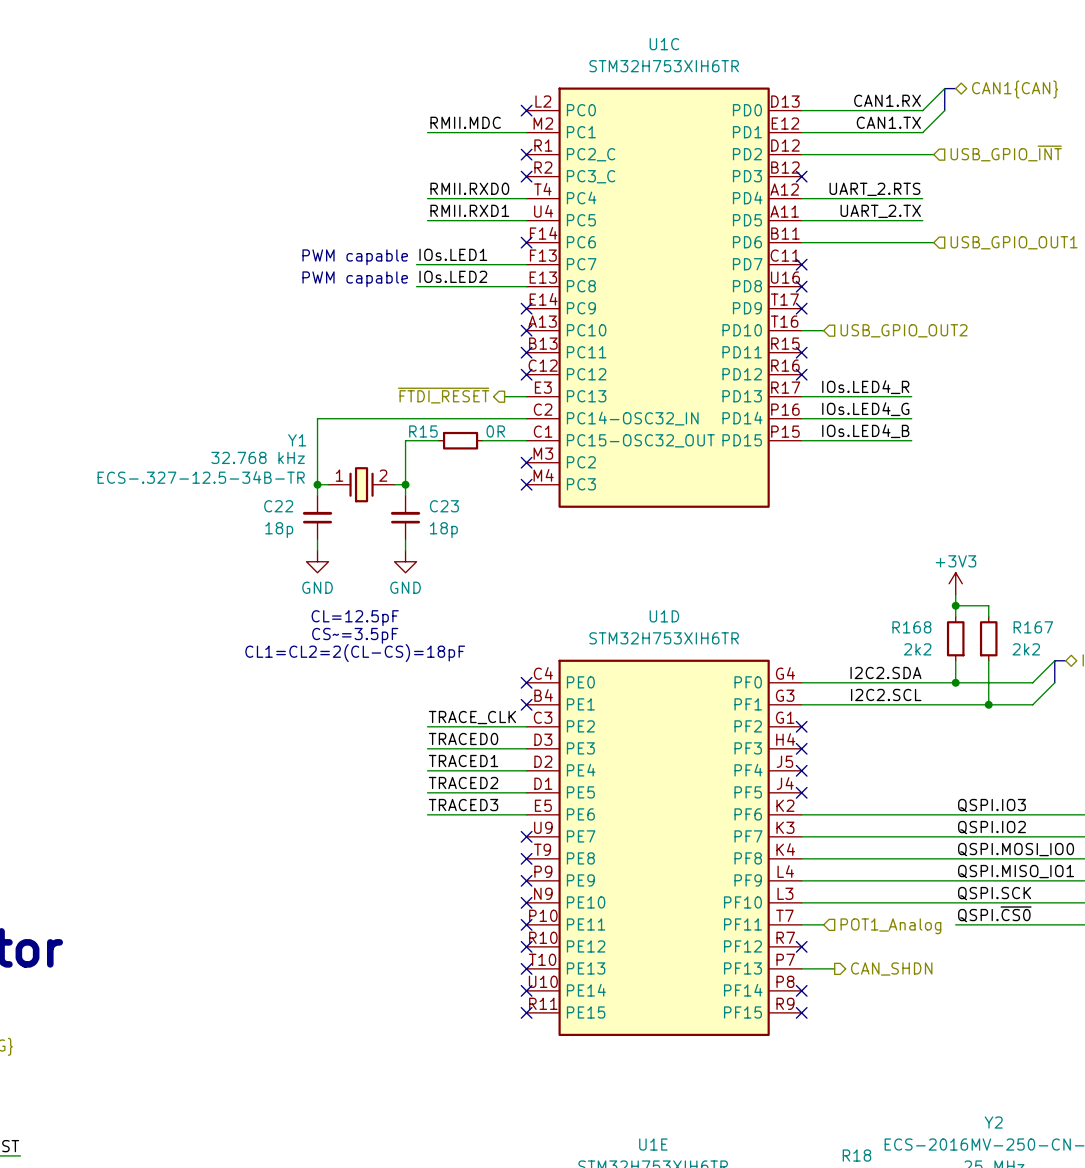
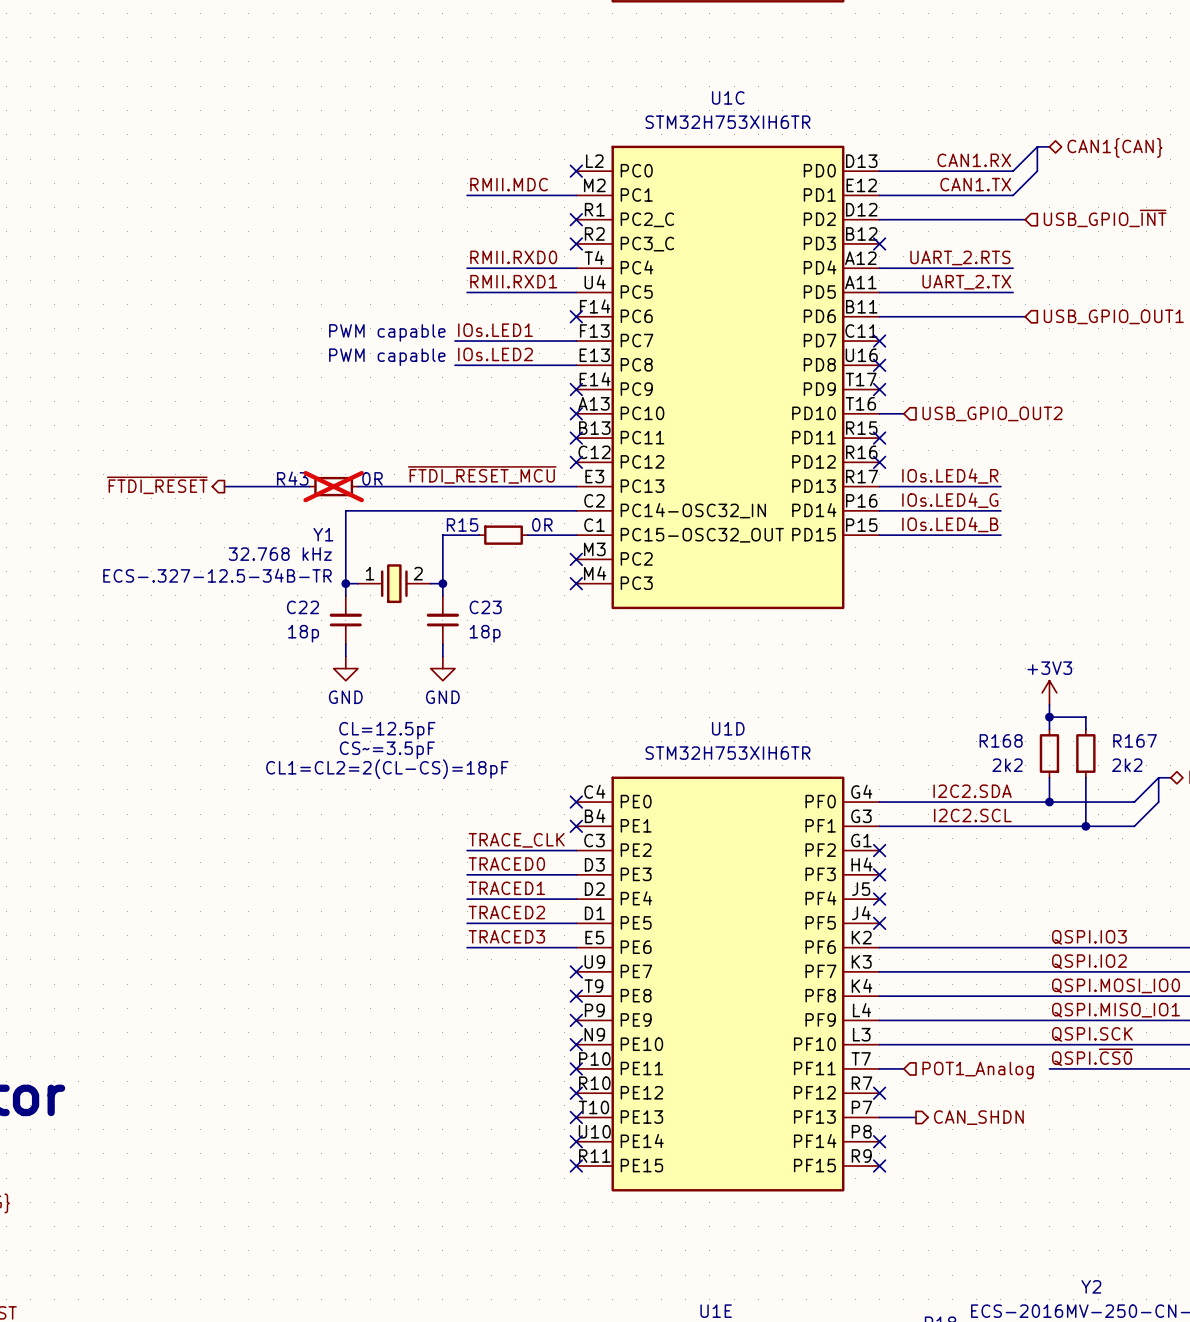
label: none -> ~{FTDI_RESET_MCU} (482, 474)
hierarchical label: none -> ~{FTDI_RESET} (157, 485)
hierarchical label: ~{FTDI_RESET} (443, 395) -> none
wire: none -> (224, 486) (309, 486)
R43: none -> (333, 486)
wire: none -> (357, 486) (552, 486)

